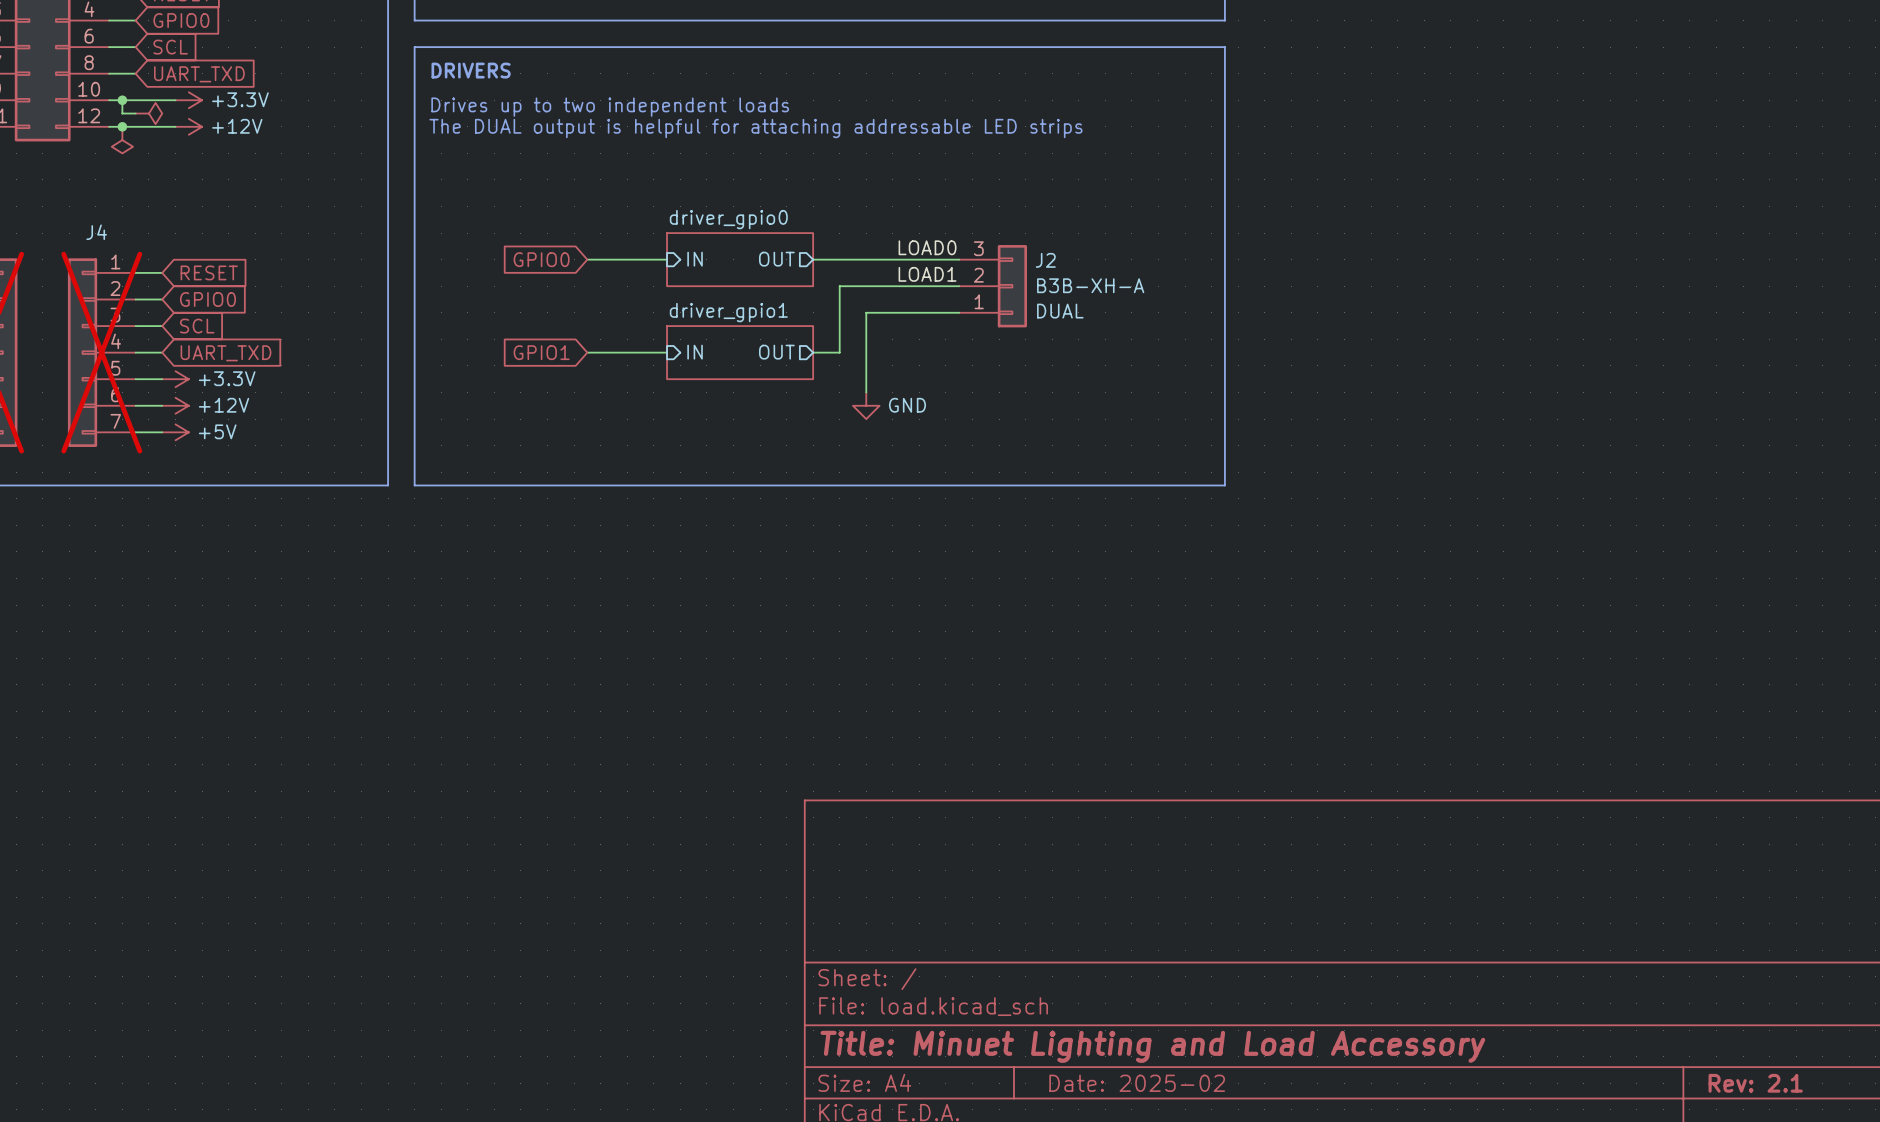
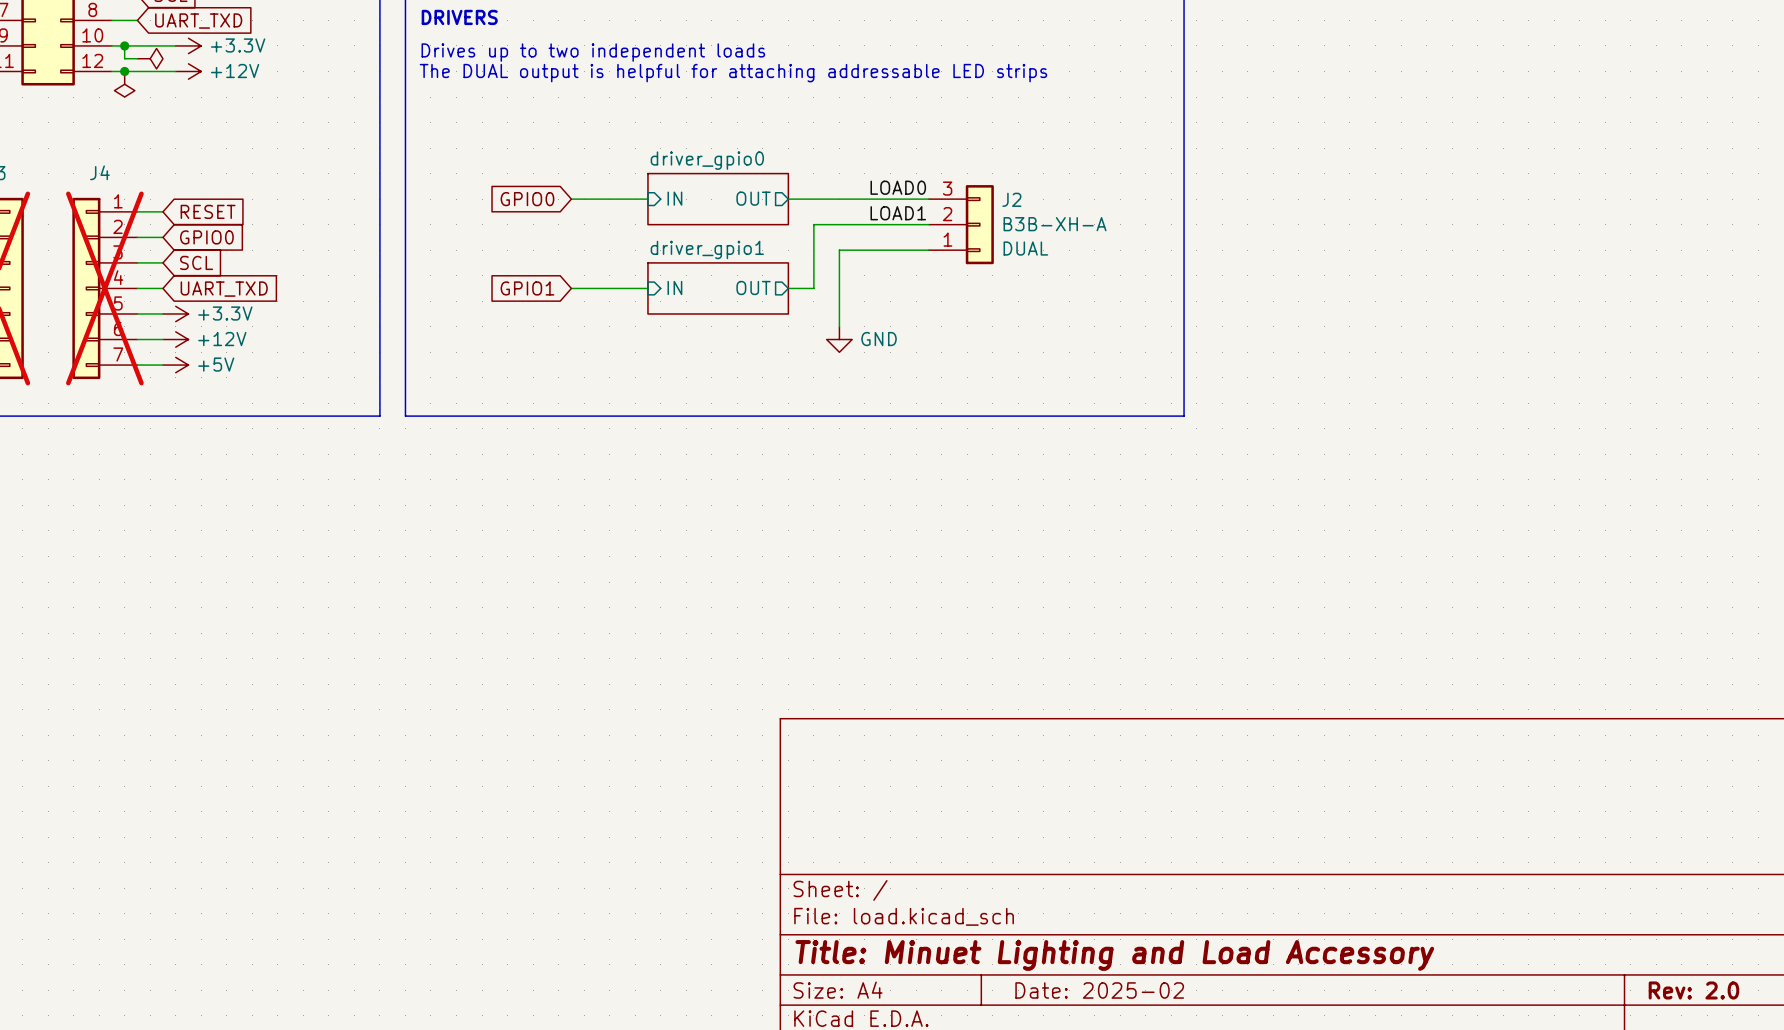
title block: Rev: 2.1 (1755, 1083) -> Rev: 2.0 (1693, 990)

